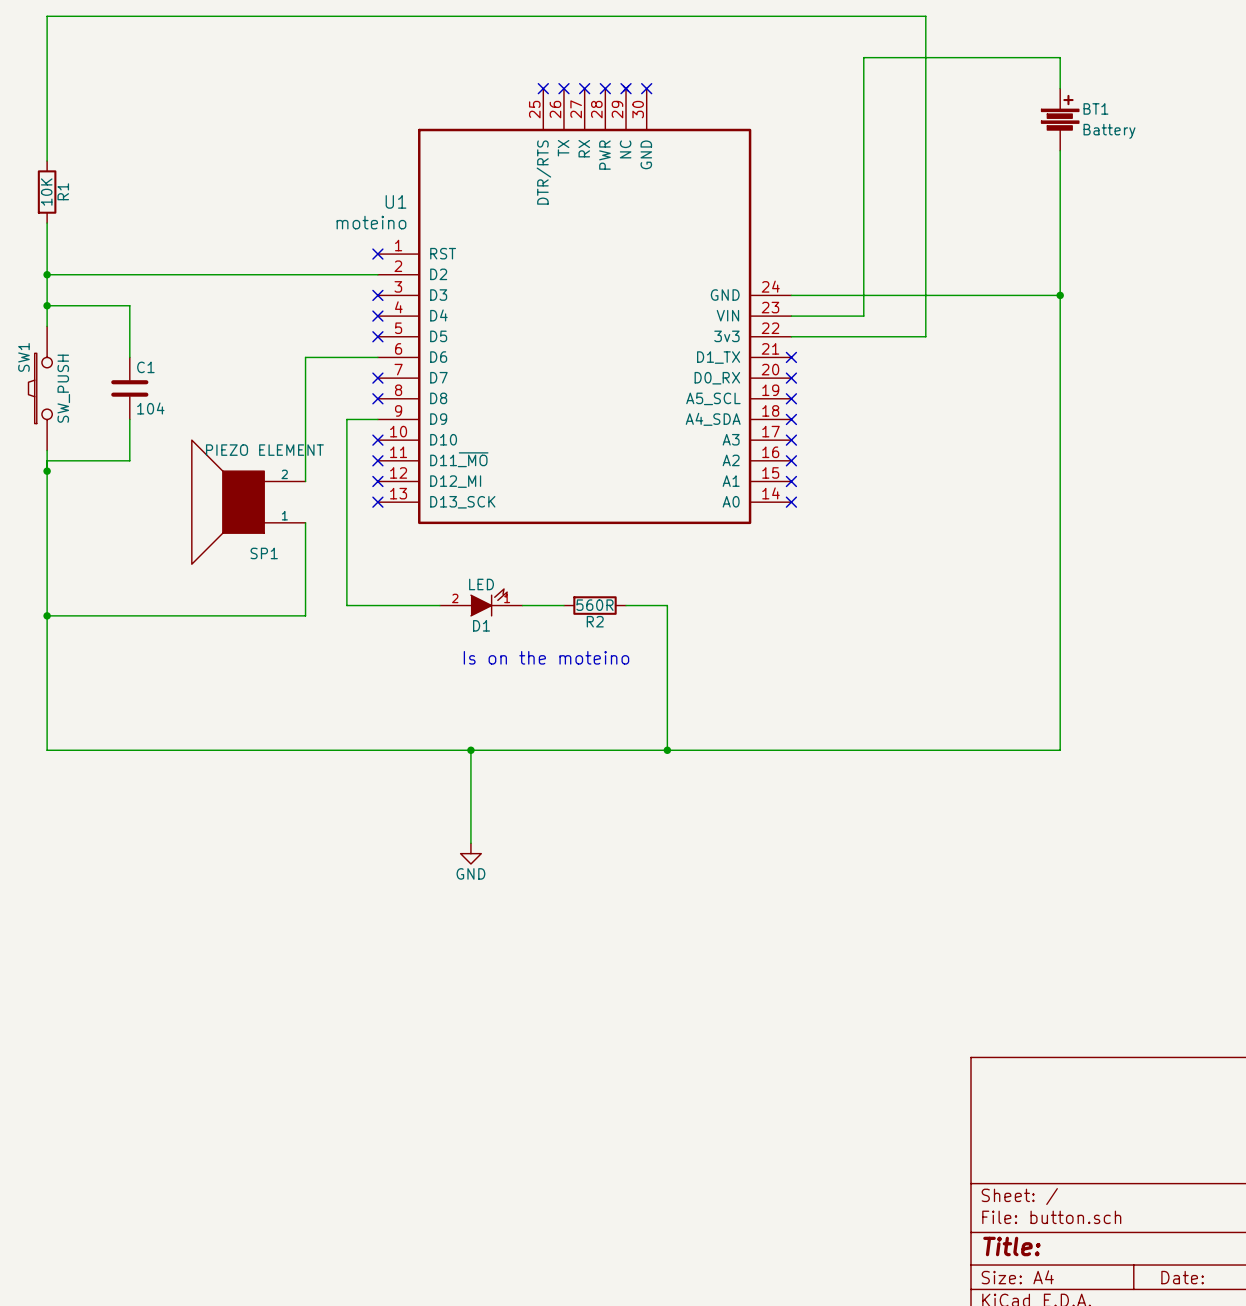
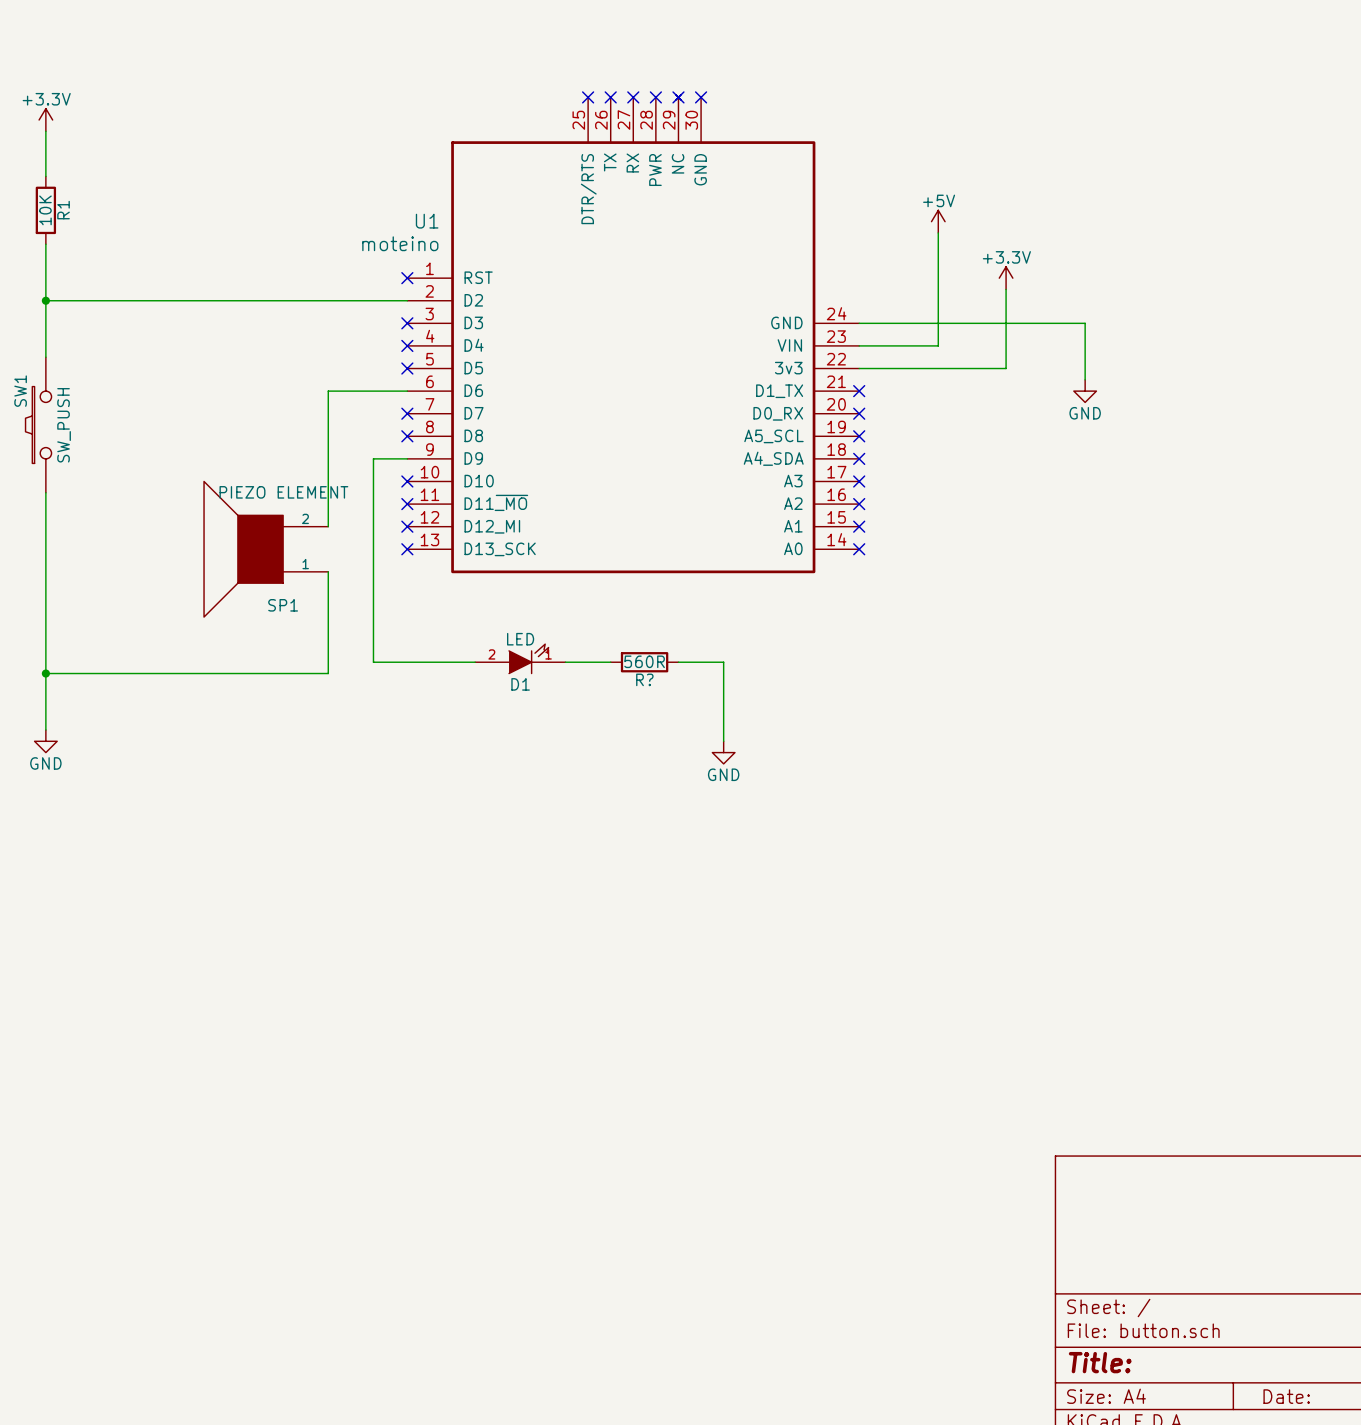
wire: (1060, 88) (1060, 57) (863, 57) (863, 212) -> none
power symbol: none -> +3.3V (45, 120)
wire: (47, 119) (47, 16) (925, 16) (925, 264) -> none
BT1: Battery (1060, 119) -> none
wire: (1060, 150) (1060, 750) (47, 750) (47, 667) -> none
power symbol: none -> +5V (938, 221)
power symbol: none -> +3.3V (1006, 278)
wire: (998, 295) (1060, 295) -> (1085, 323) (1085, 379)
junction: (1060, 295) -> none
wire: (47, 305) (129, 305) (129, 357) -> none
junction: (47, 305) -> none
power symbol: none -> GND (1085, 391)
C1: 104 (129, 388) -> none
wire: (129, 419) (129, 460) (47, 460) -> none
junction: (47, 471) -> none
R2 name: R2 (595, 621) -> R? (644, 679)
text: Is on the moteino (546, 657) -> none
power symbol: none -> GND (45, 741)
wire: (667, 677) (667, 750) -> none
power symbol: none -> GND (723, 752)
wire: (470, 750) (470, 843) -> none
junction: (470, 750) -> none
junction: (667, 750) -> none
power symbol: GND (470, 853) -> none

